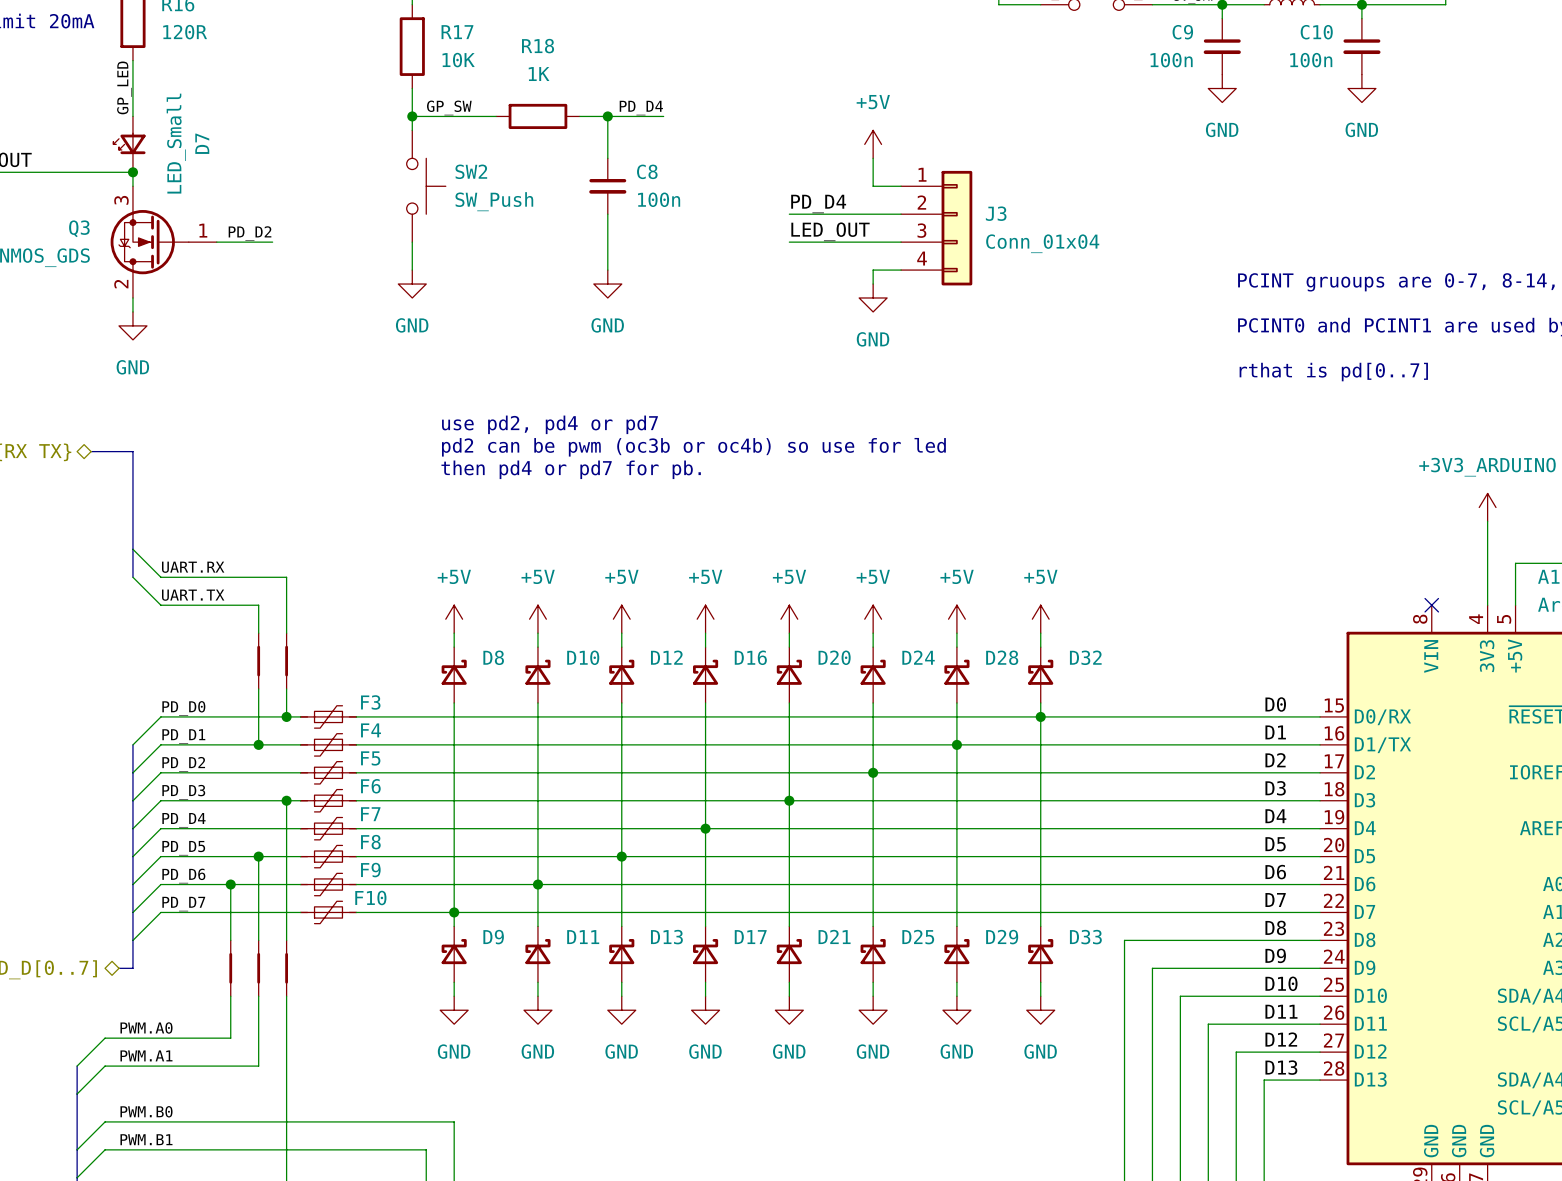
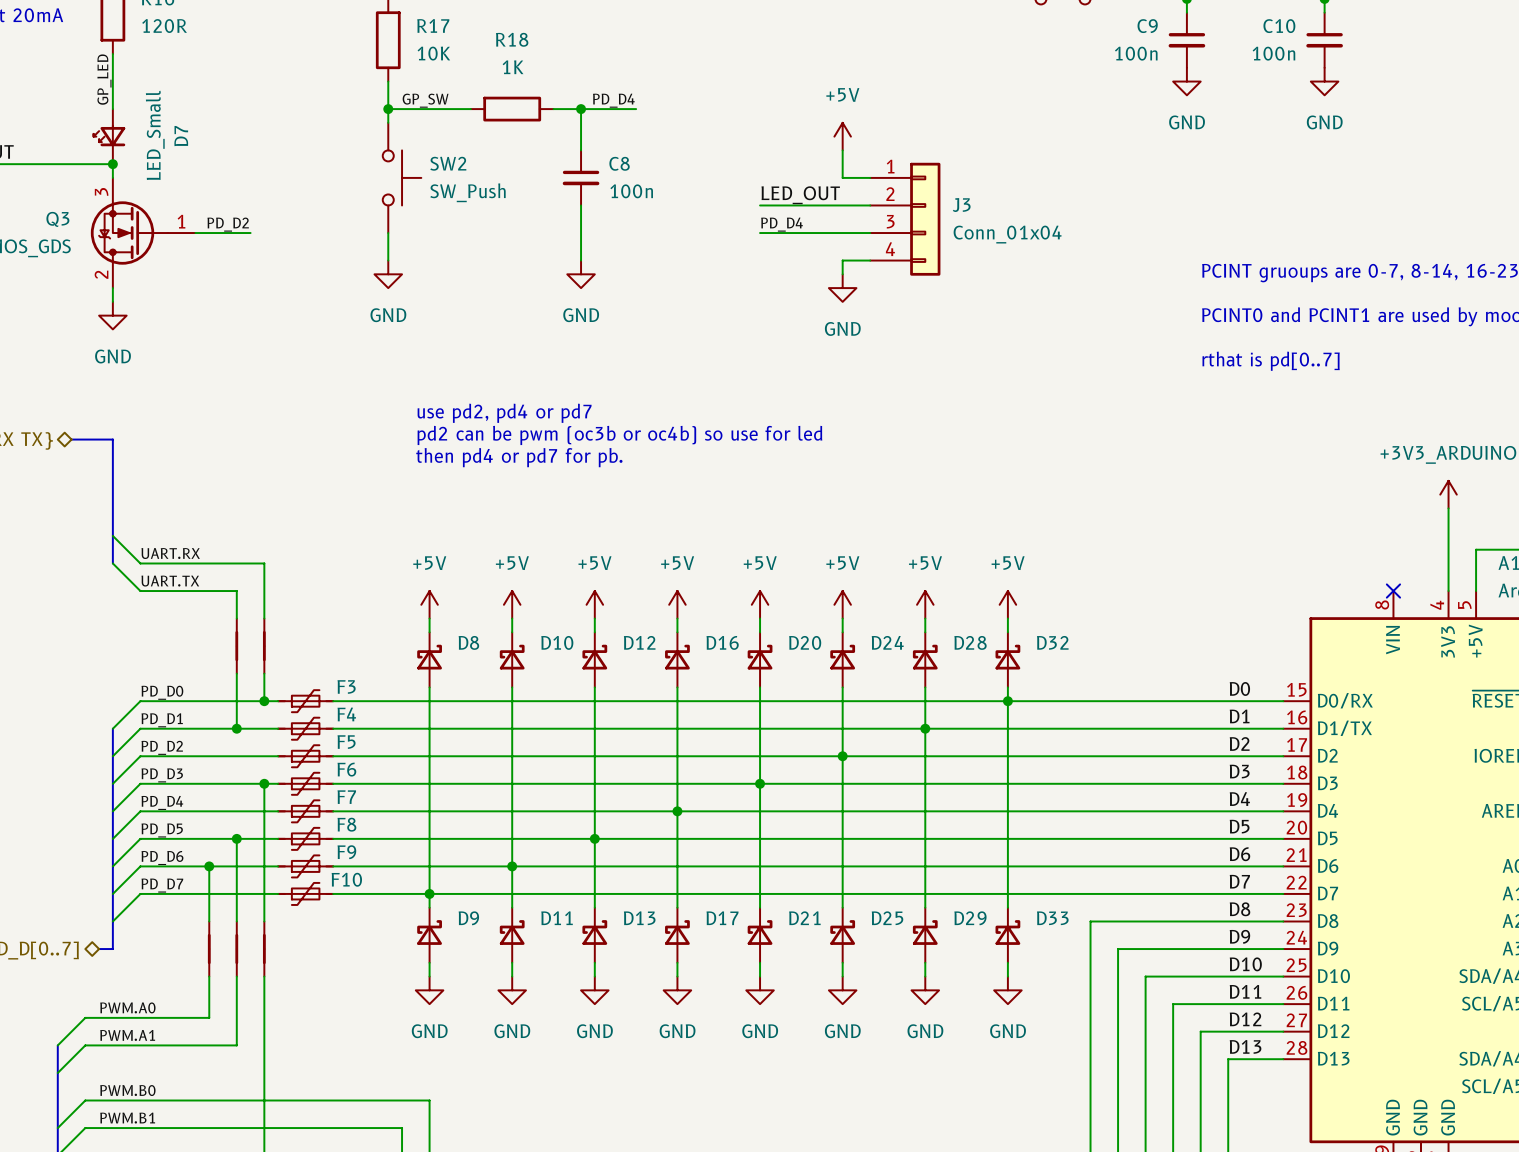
label: PD_D4 (818, 203) -> LED_OUT (800, 195)
label: LED_OUT (830, 231) -> PD_D4 (782, 224)

